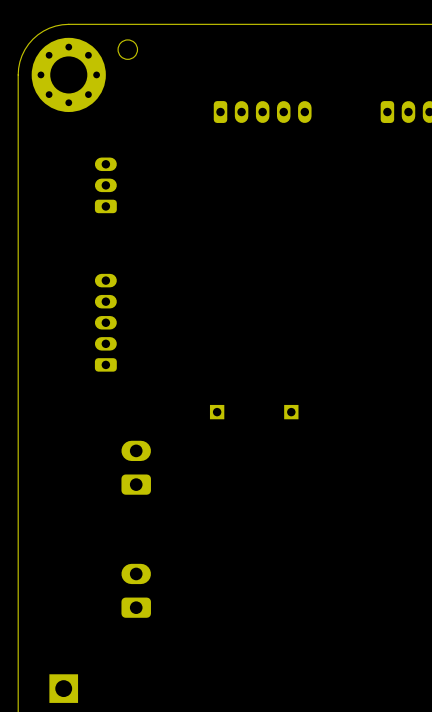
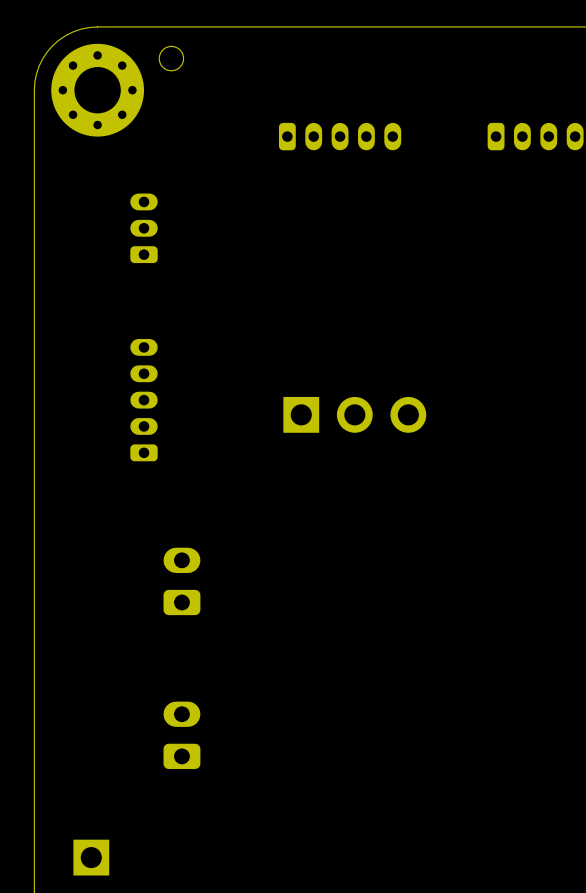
part: none -> (354, 414)
part: (217, 412) -> none
part: (291, 412) -> none

